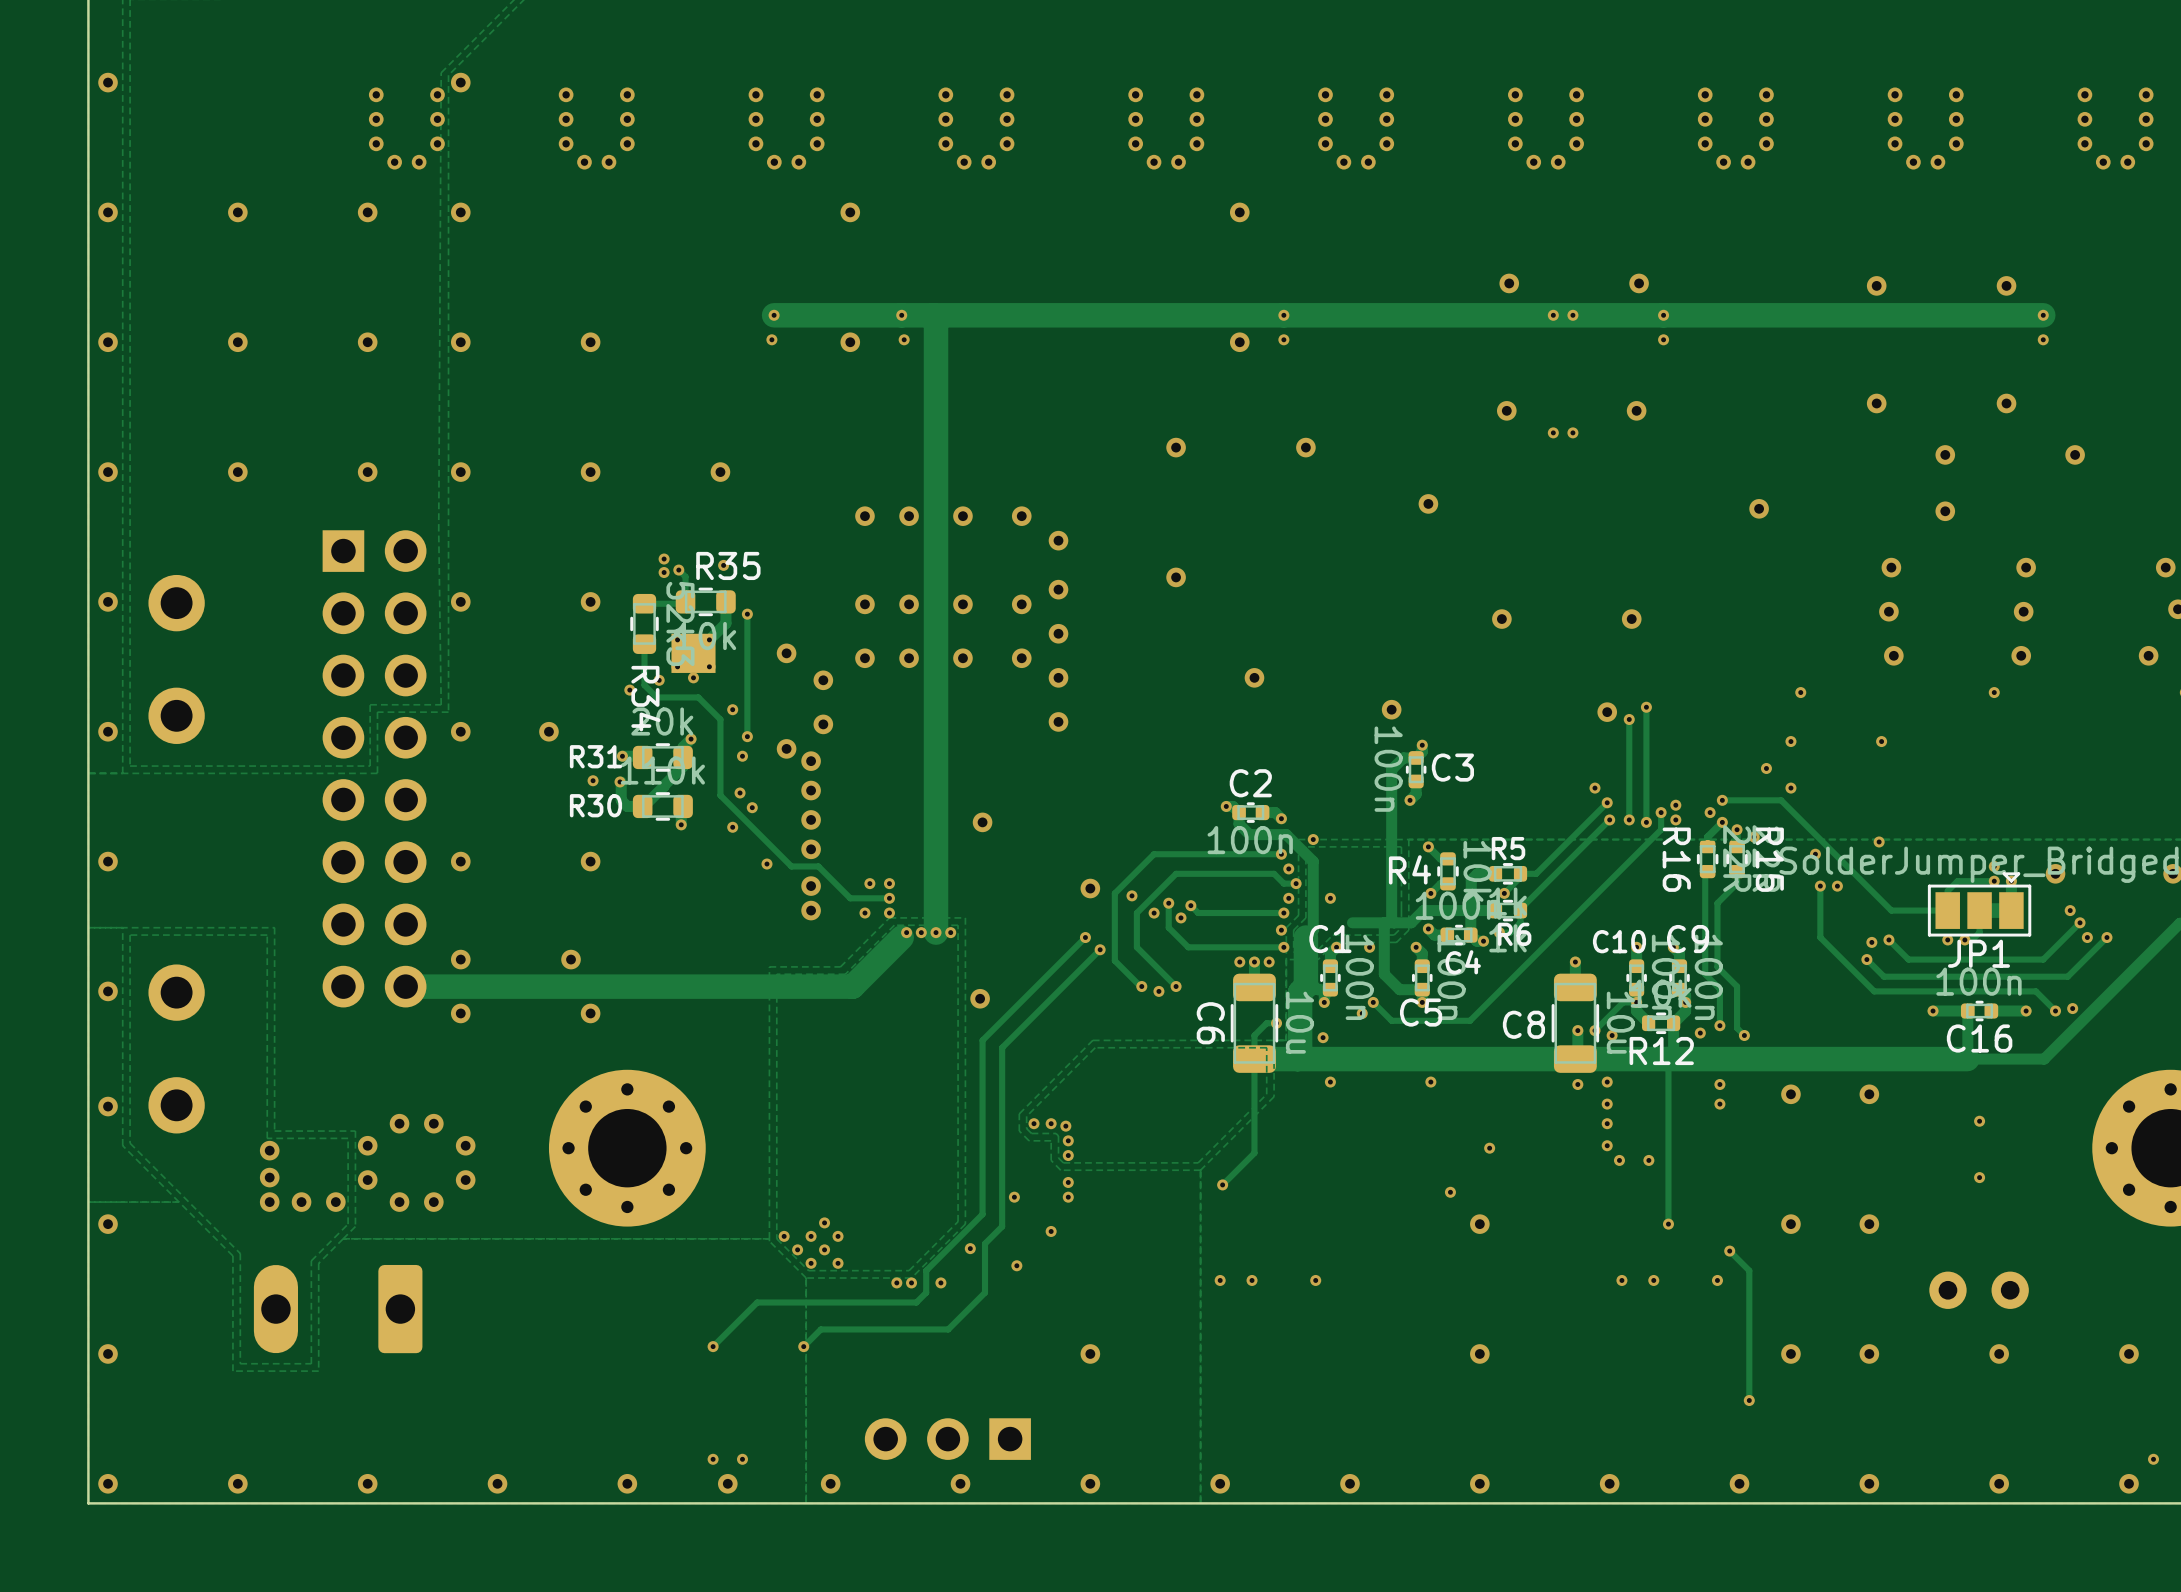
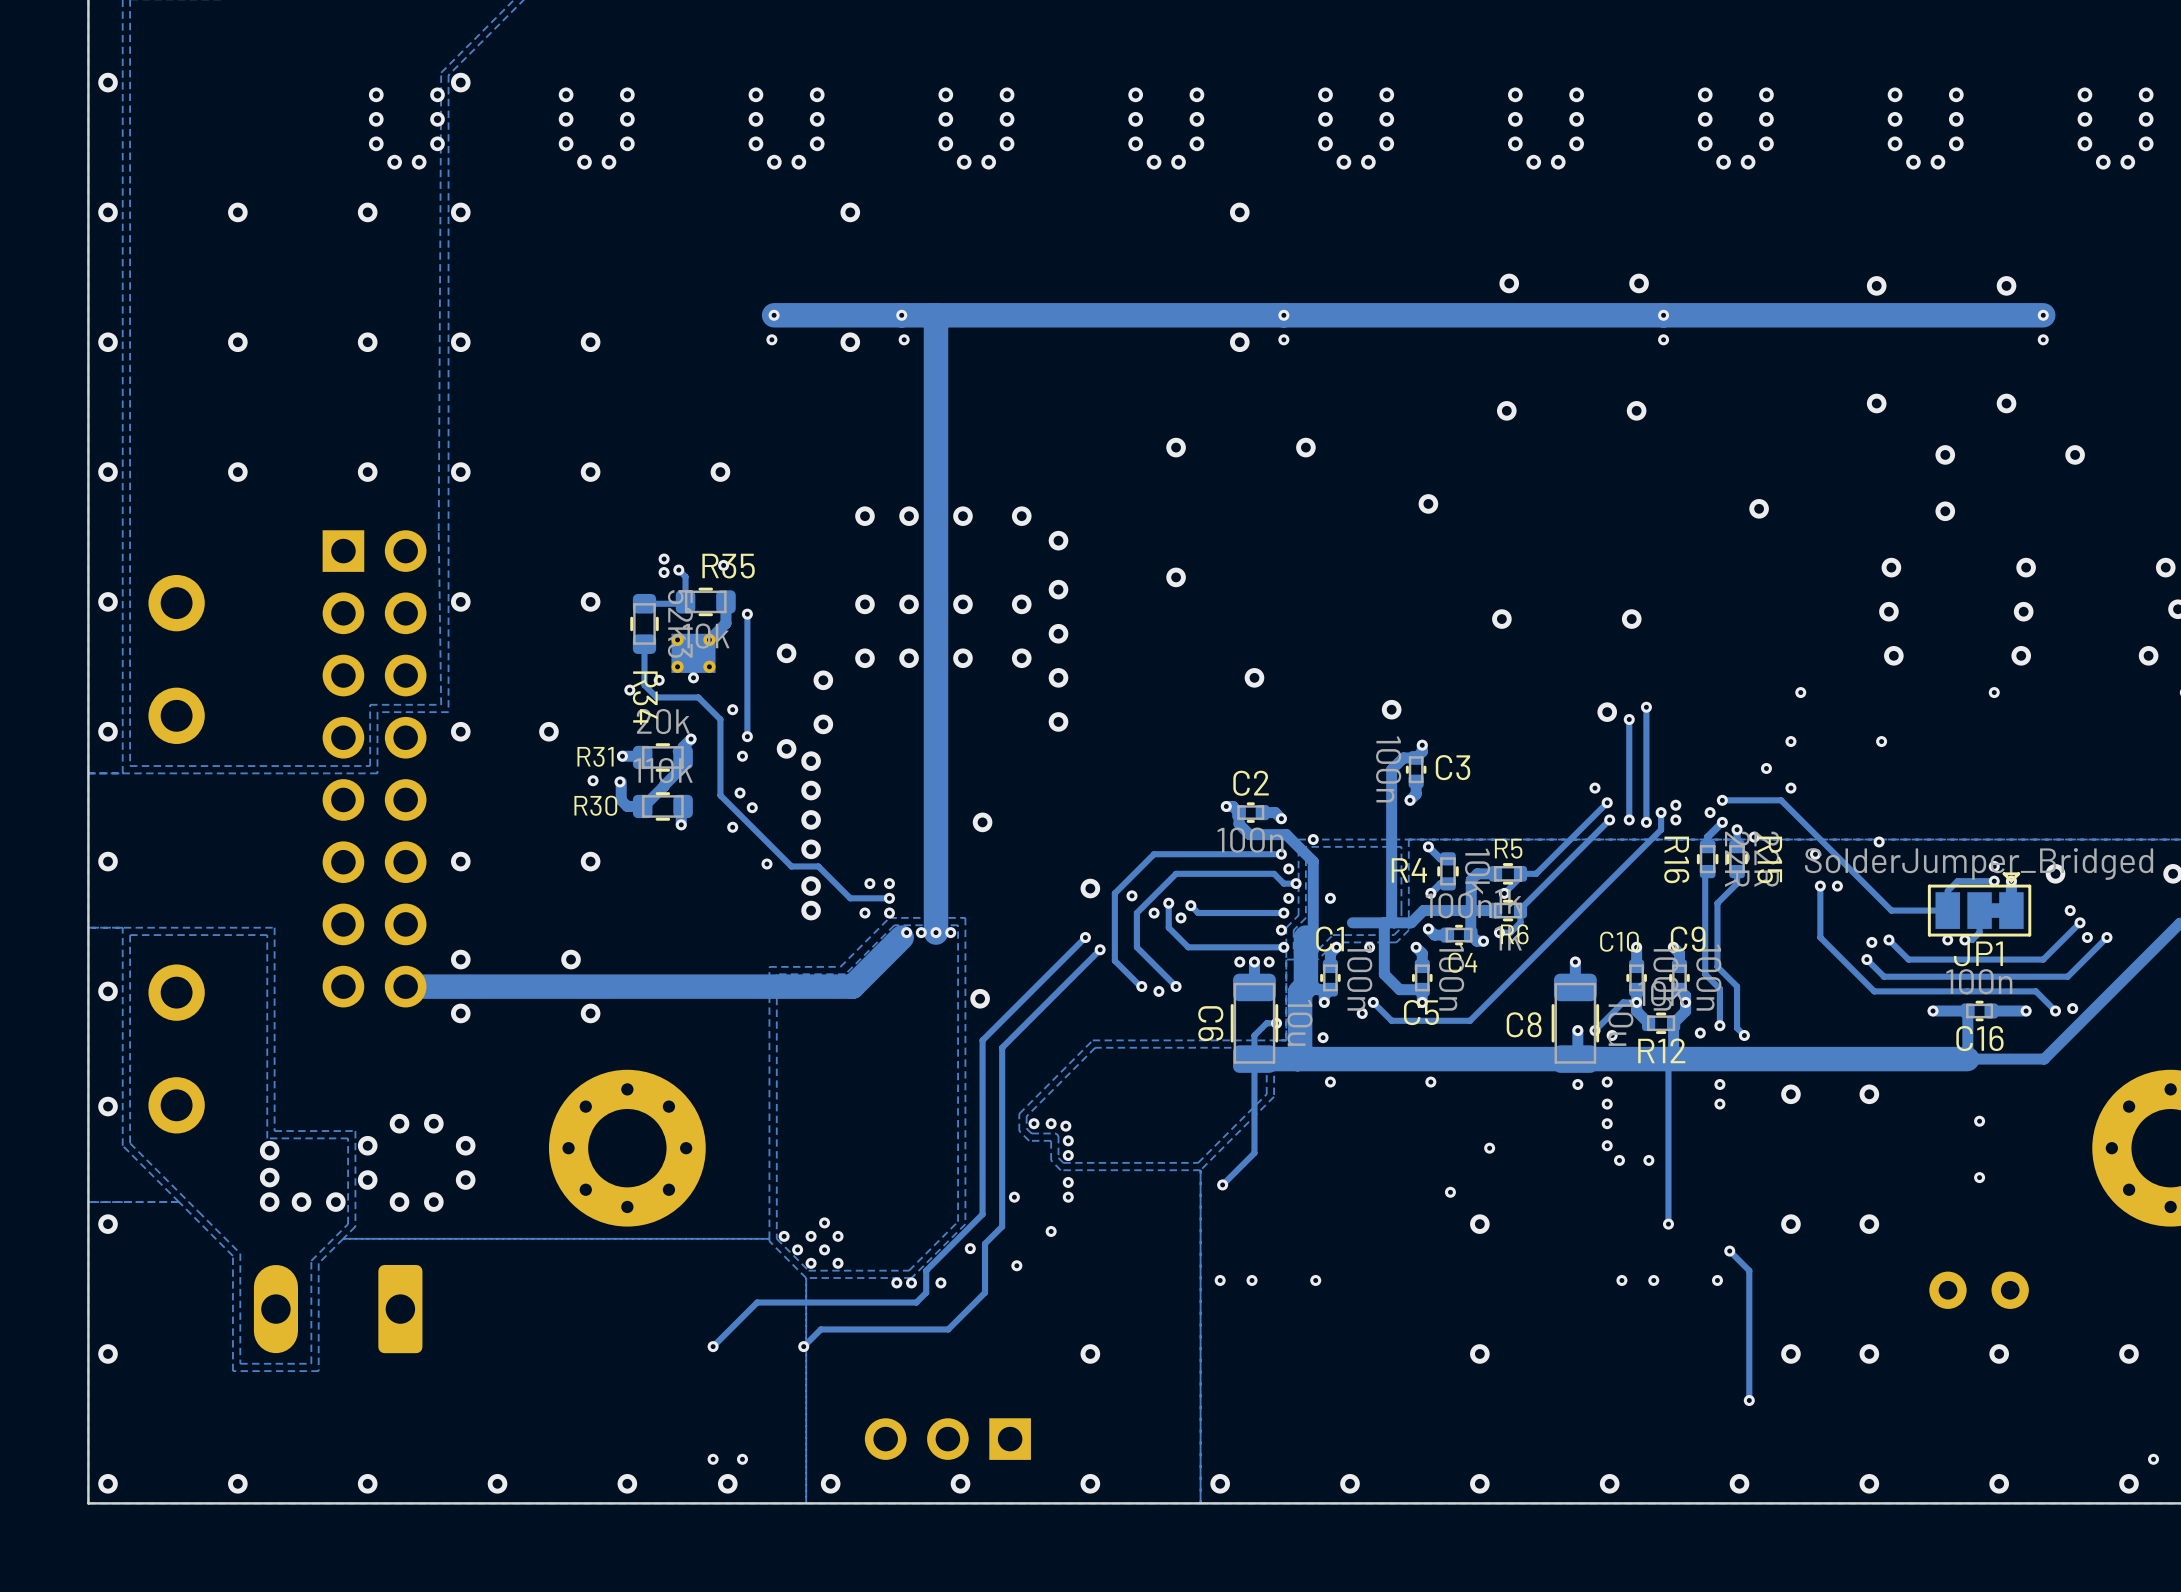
via: (1553, 315) -> none
via: (1572, 315) -> none
via: (1553, 432) -> none
via: (1572, 432) -> none

